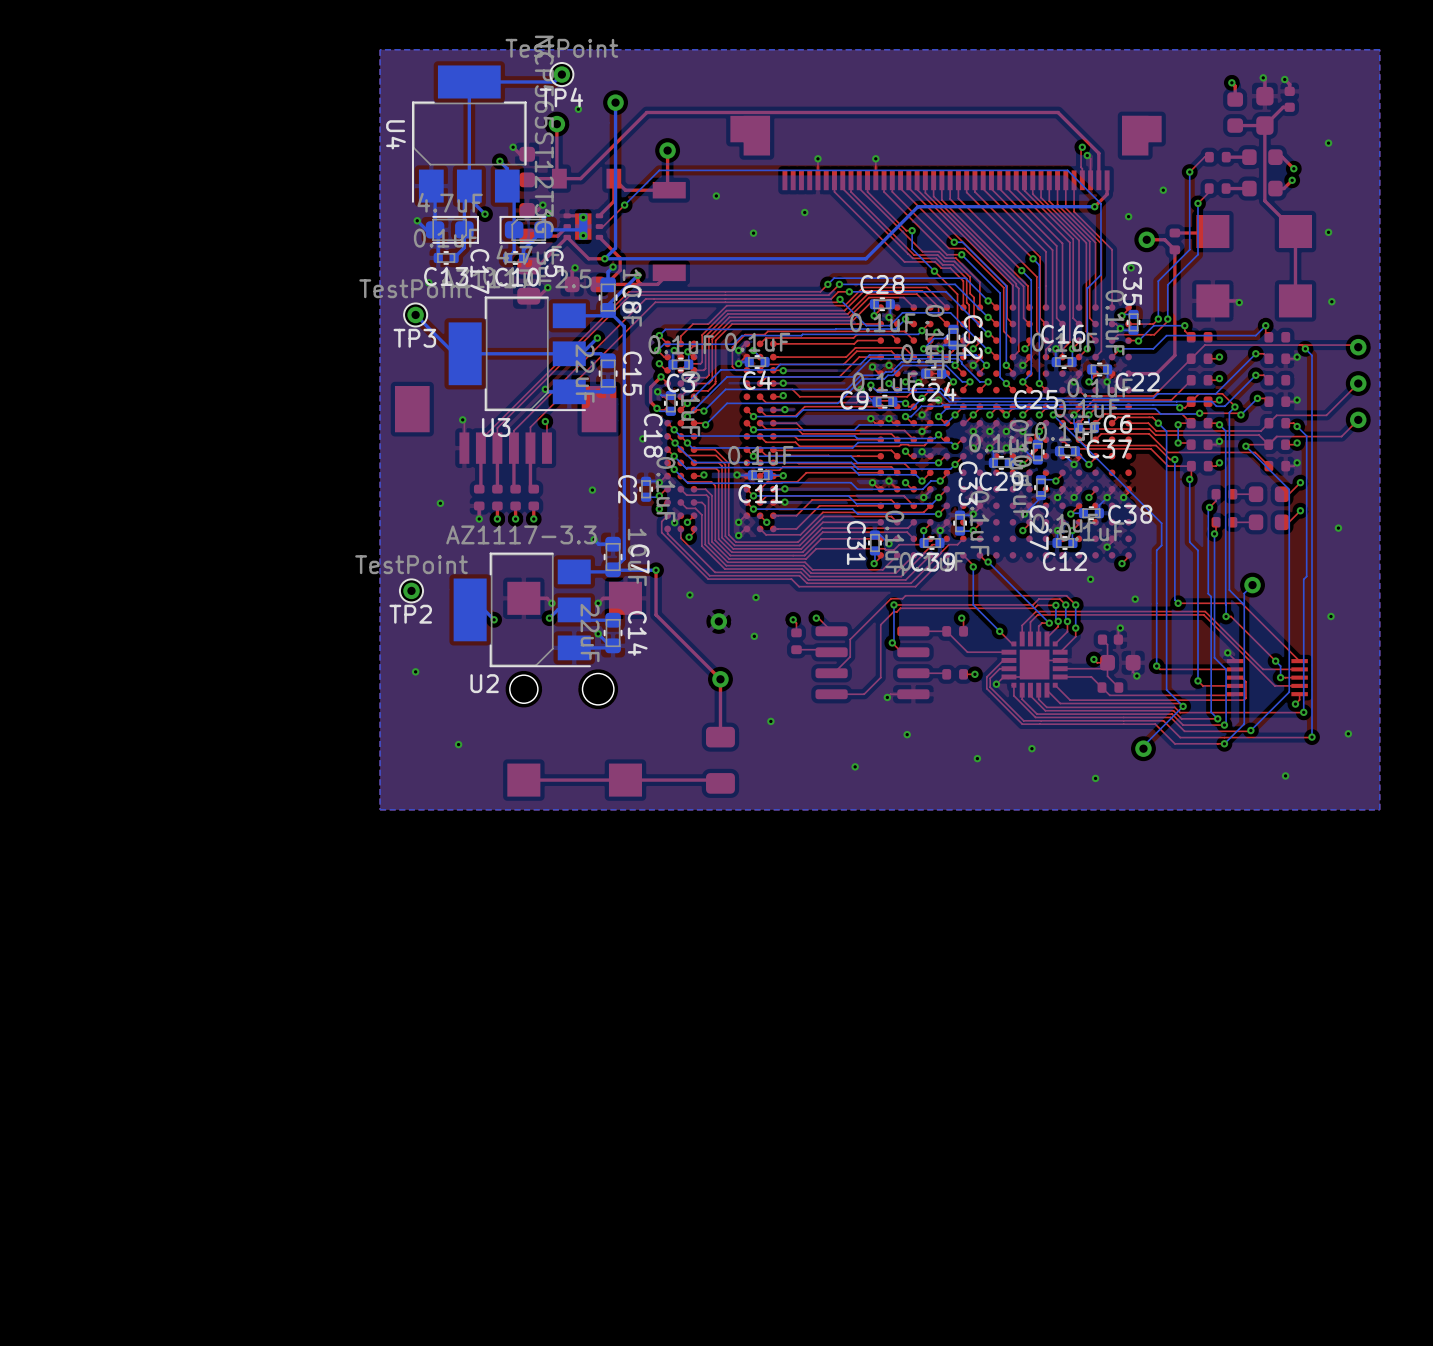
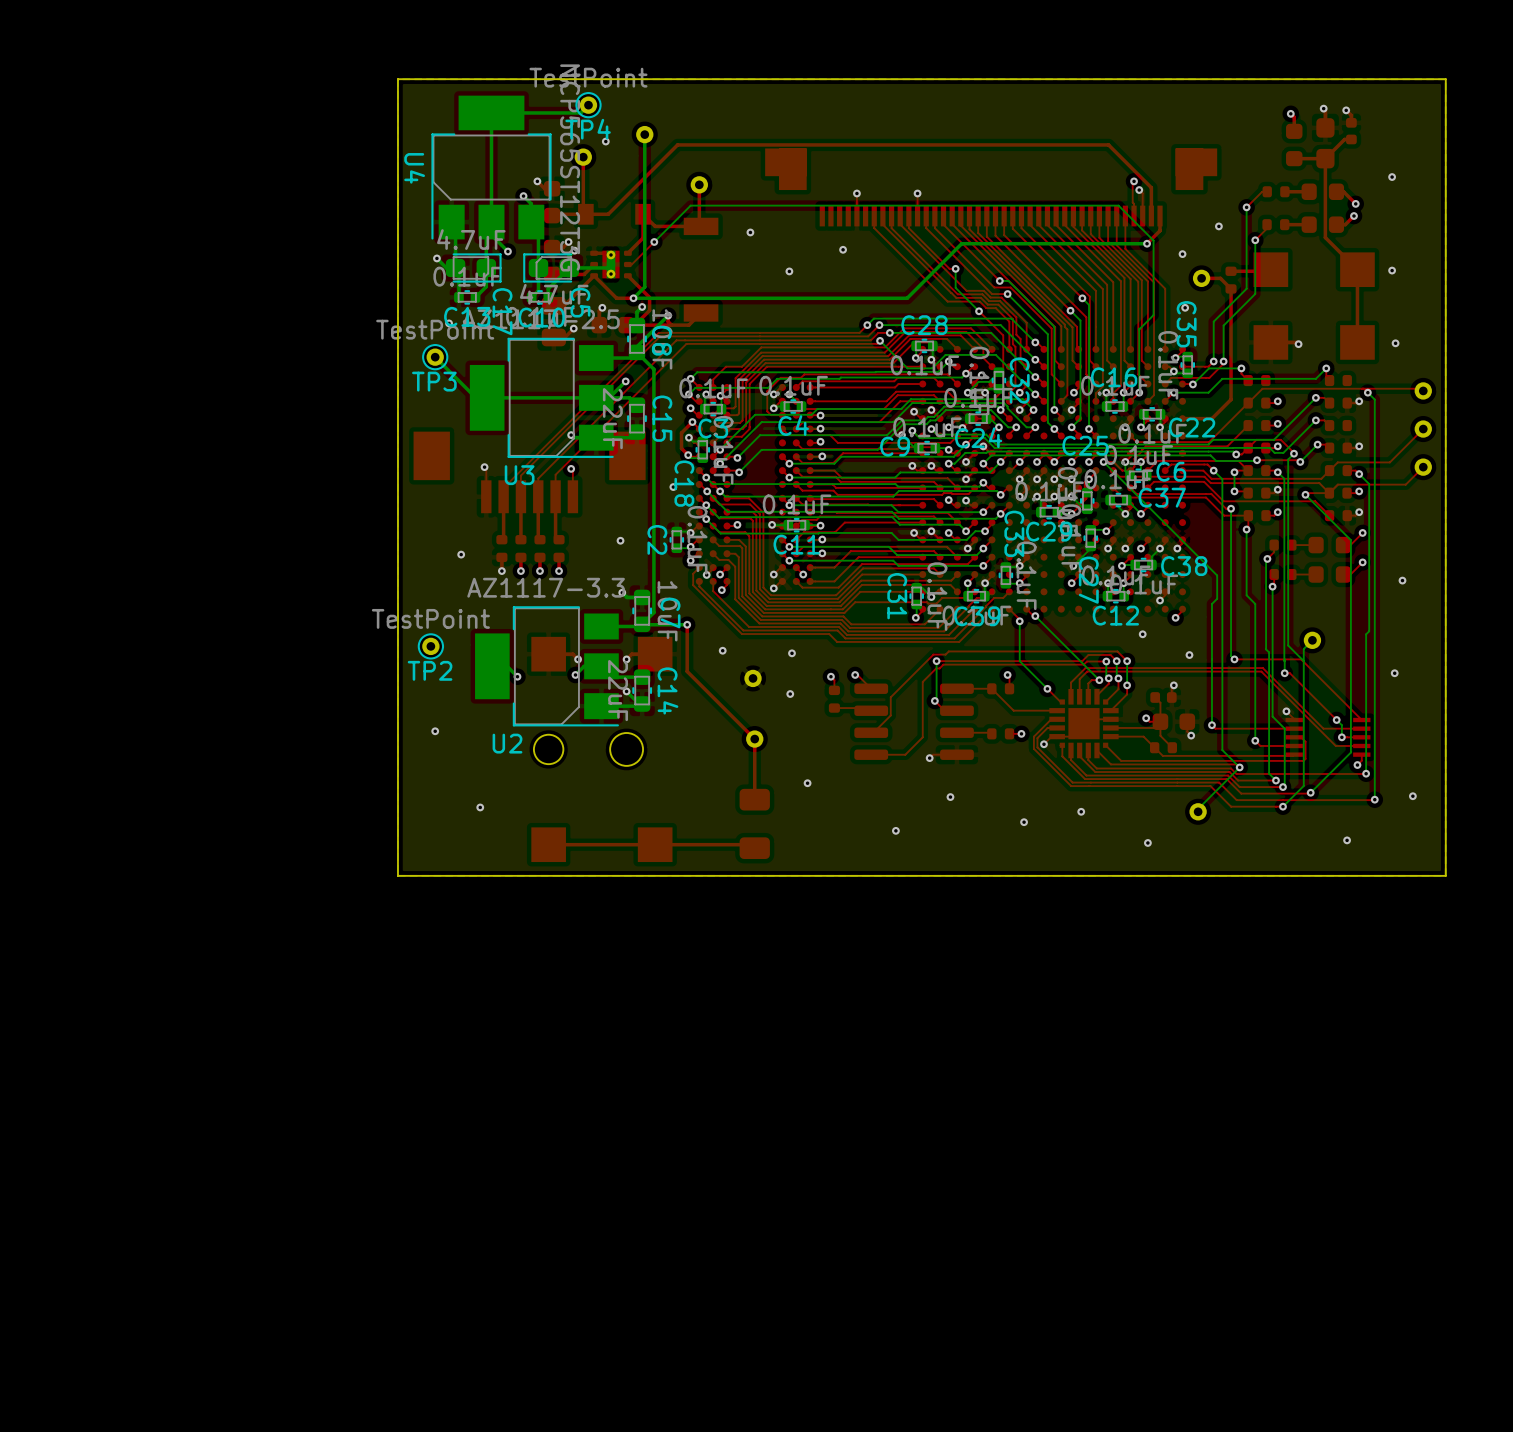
board edge: none -> (1445, 79) (397, 79) (397, 875) (1445, 875) (1445, 79)

